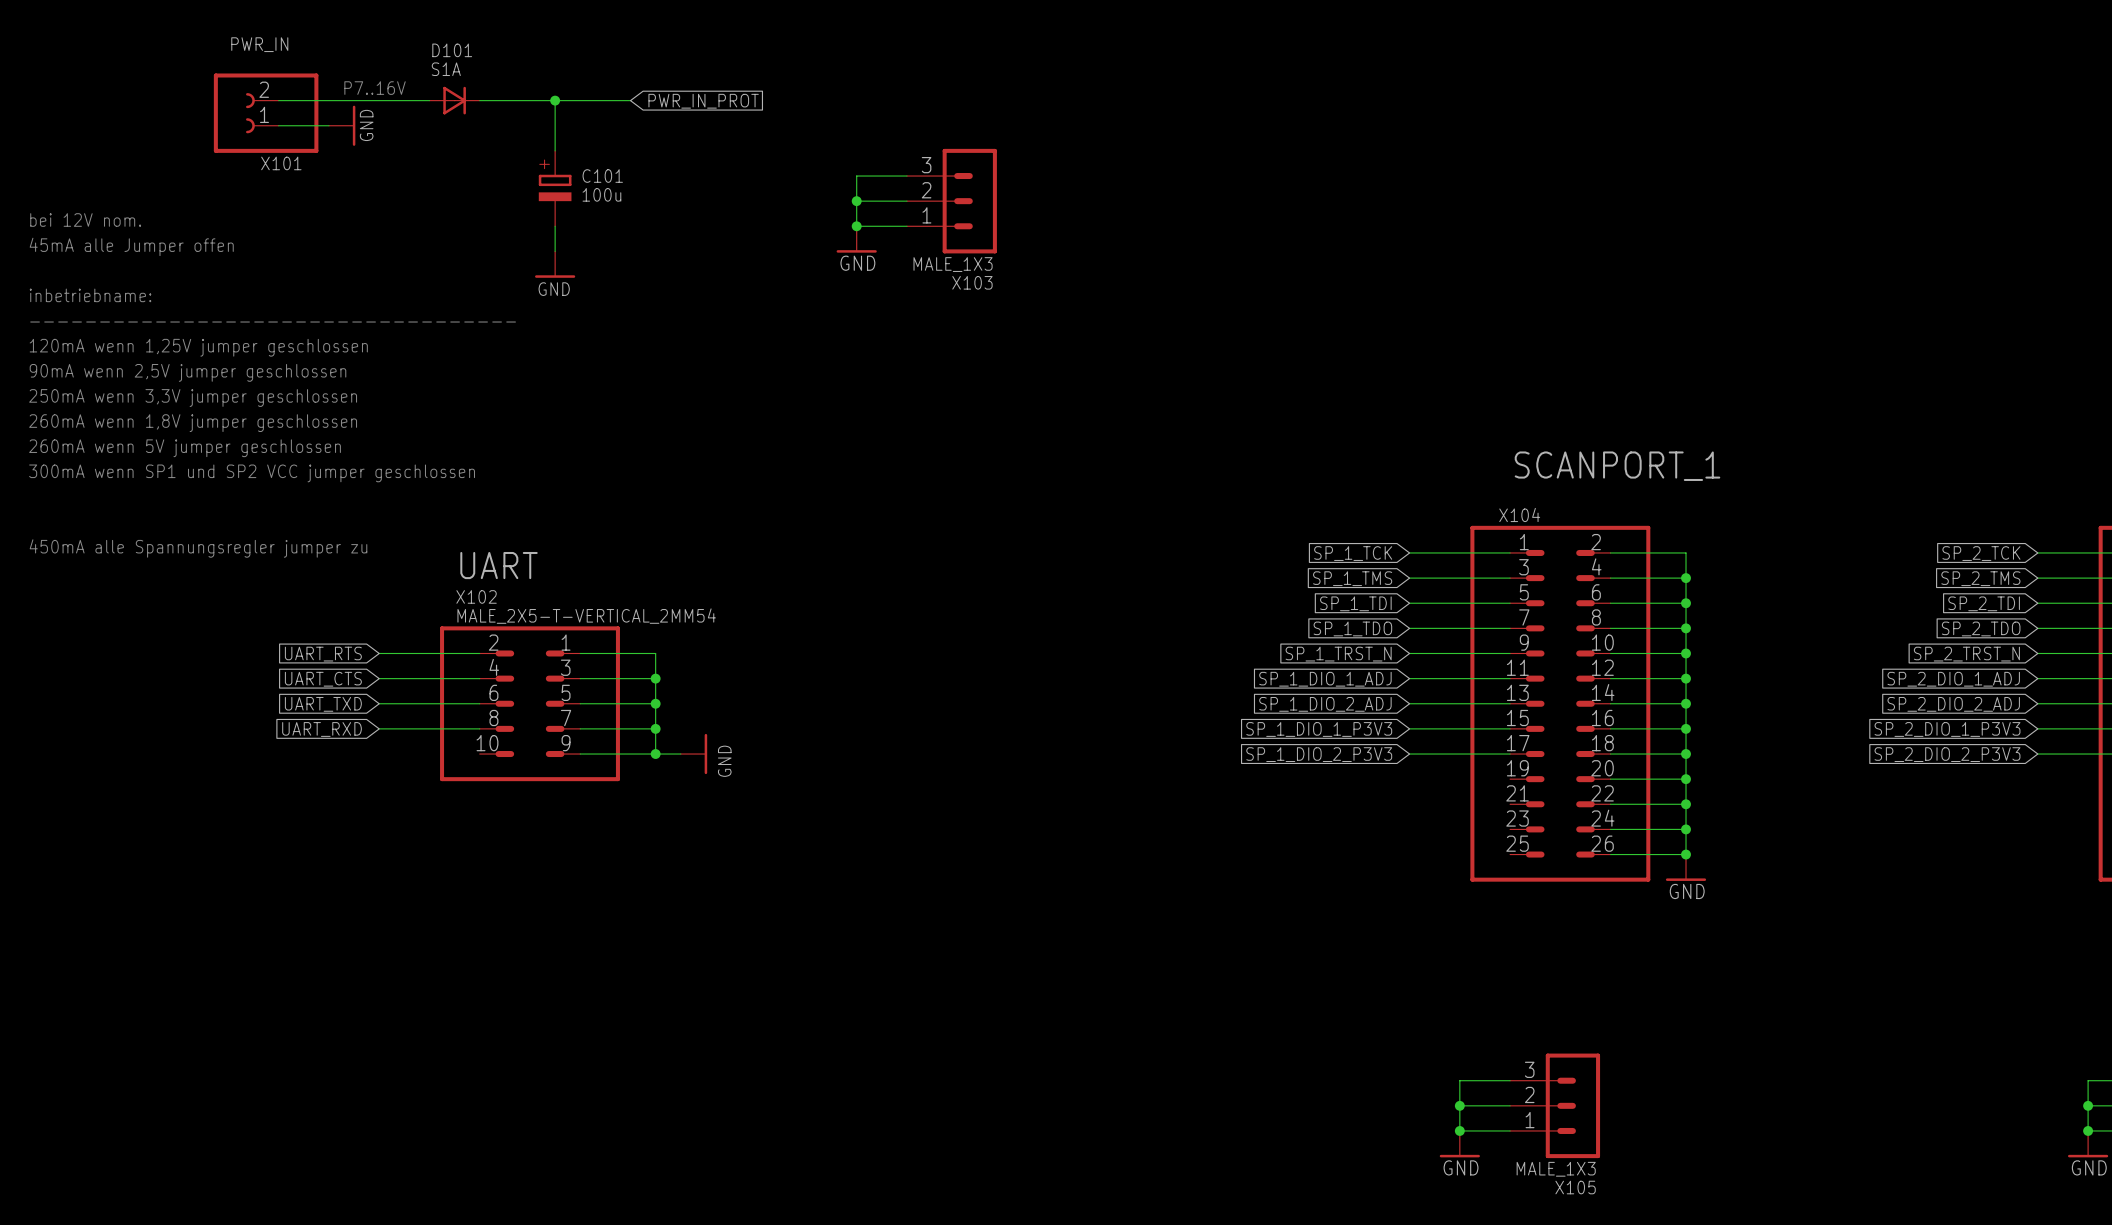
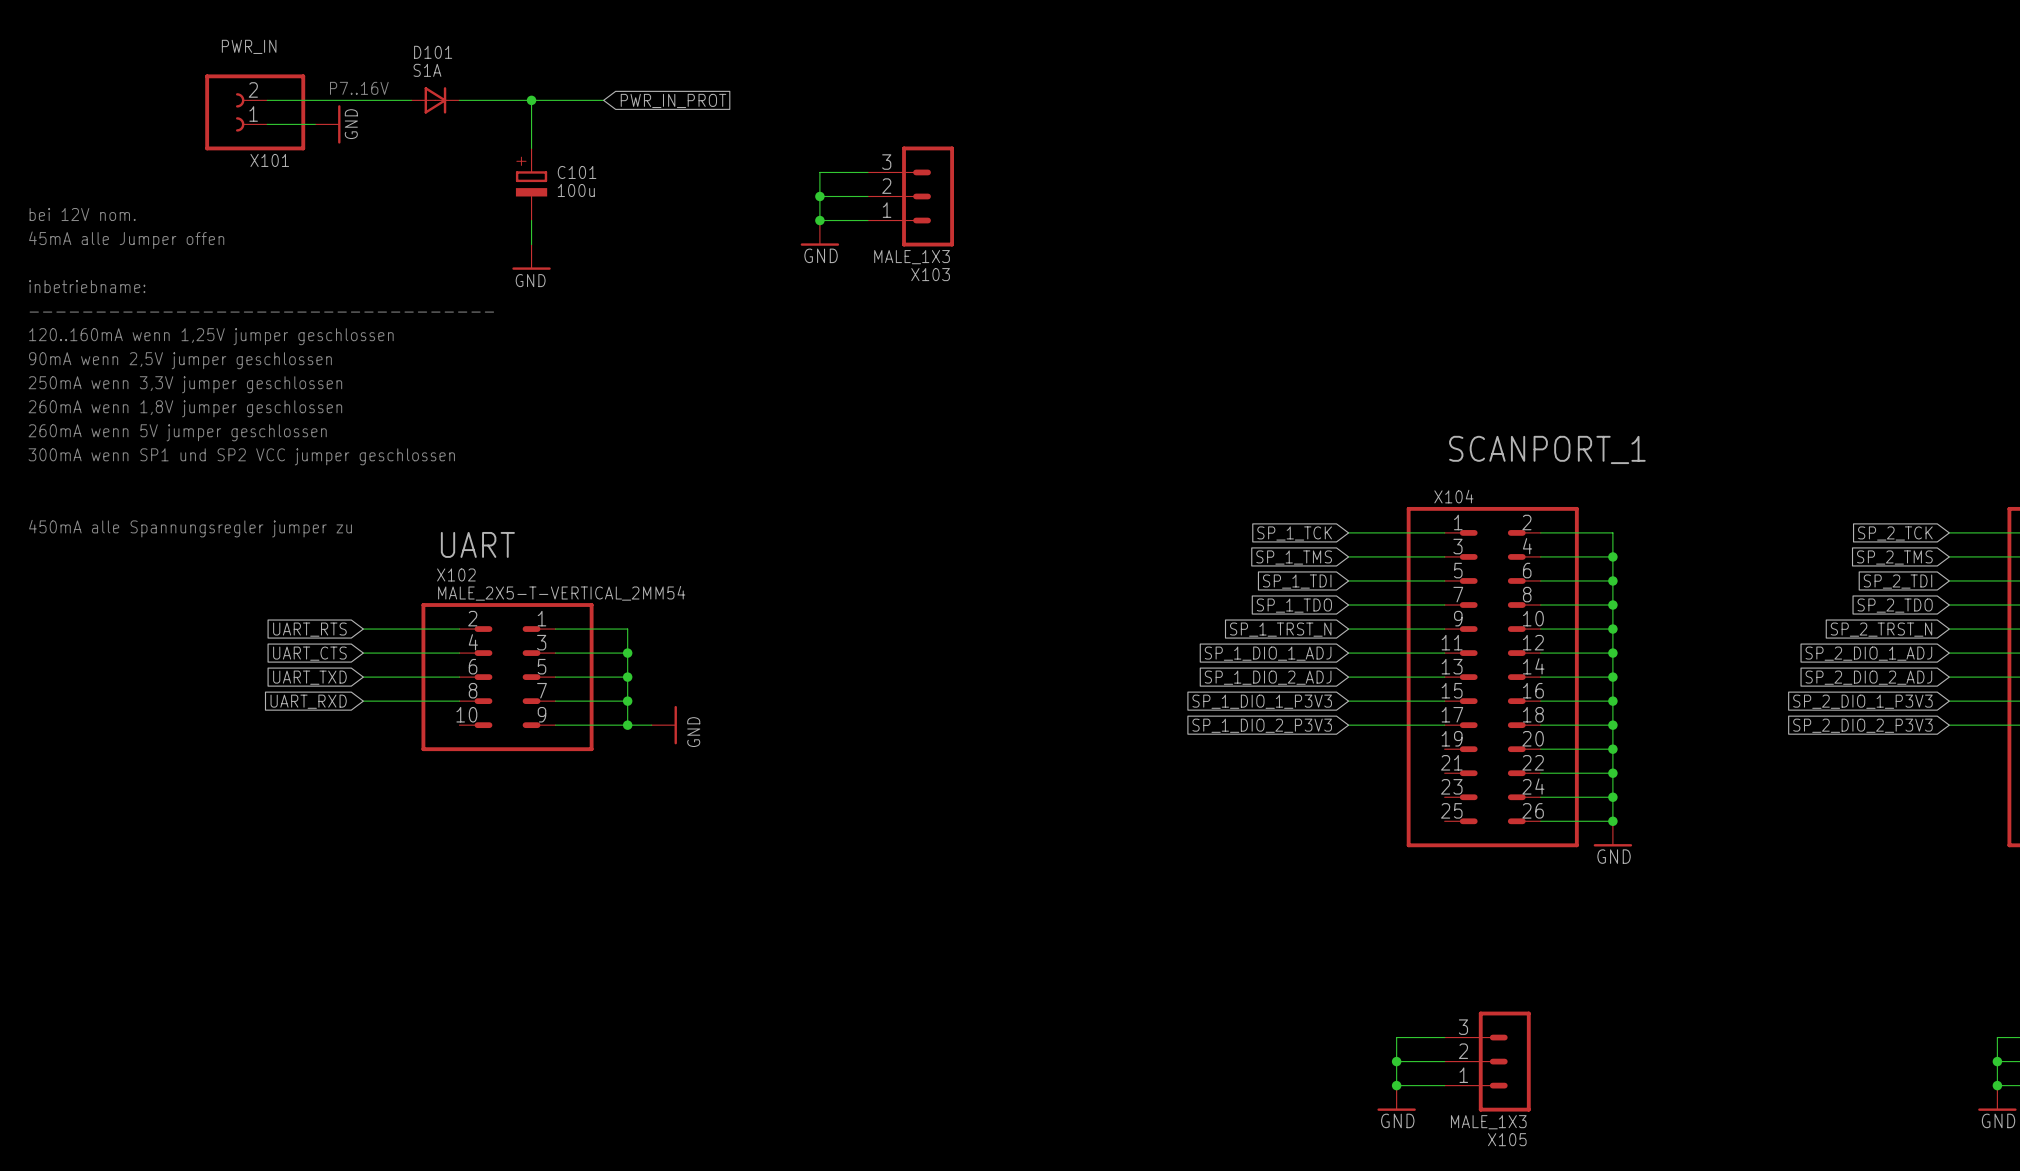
text: 120mA wenn 1,25V jumper geschlossen (198, 347) -> 120..160mA wenn 1,25V jumper geschlossen (211, 336)

